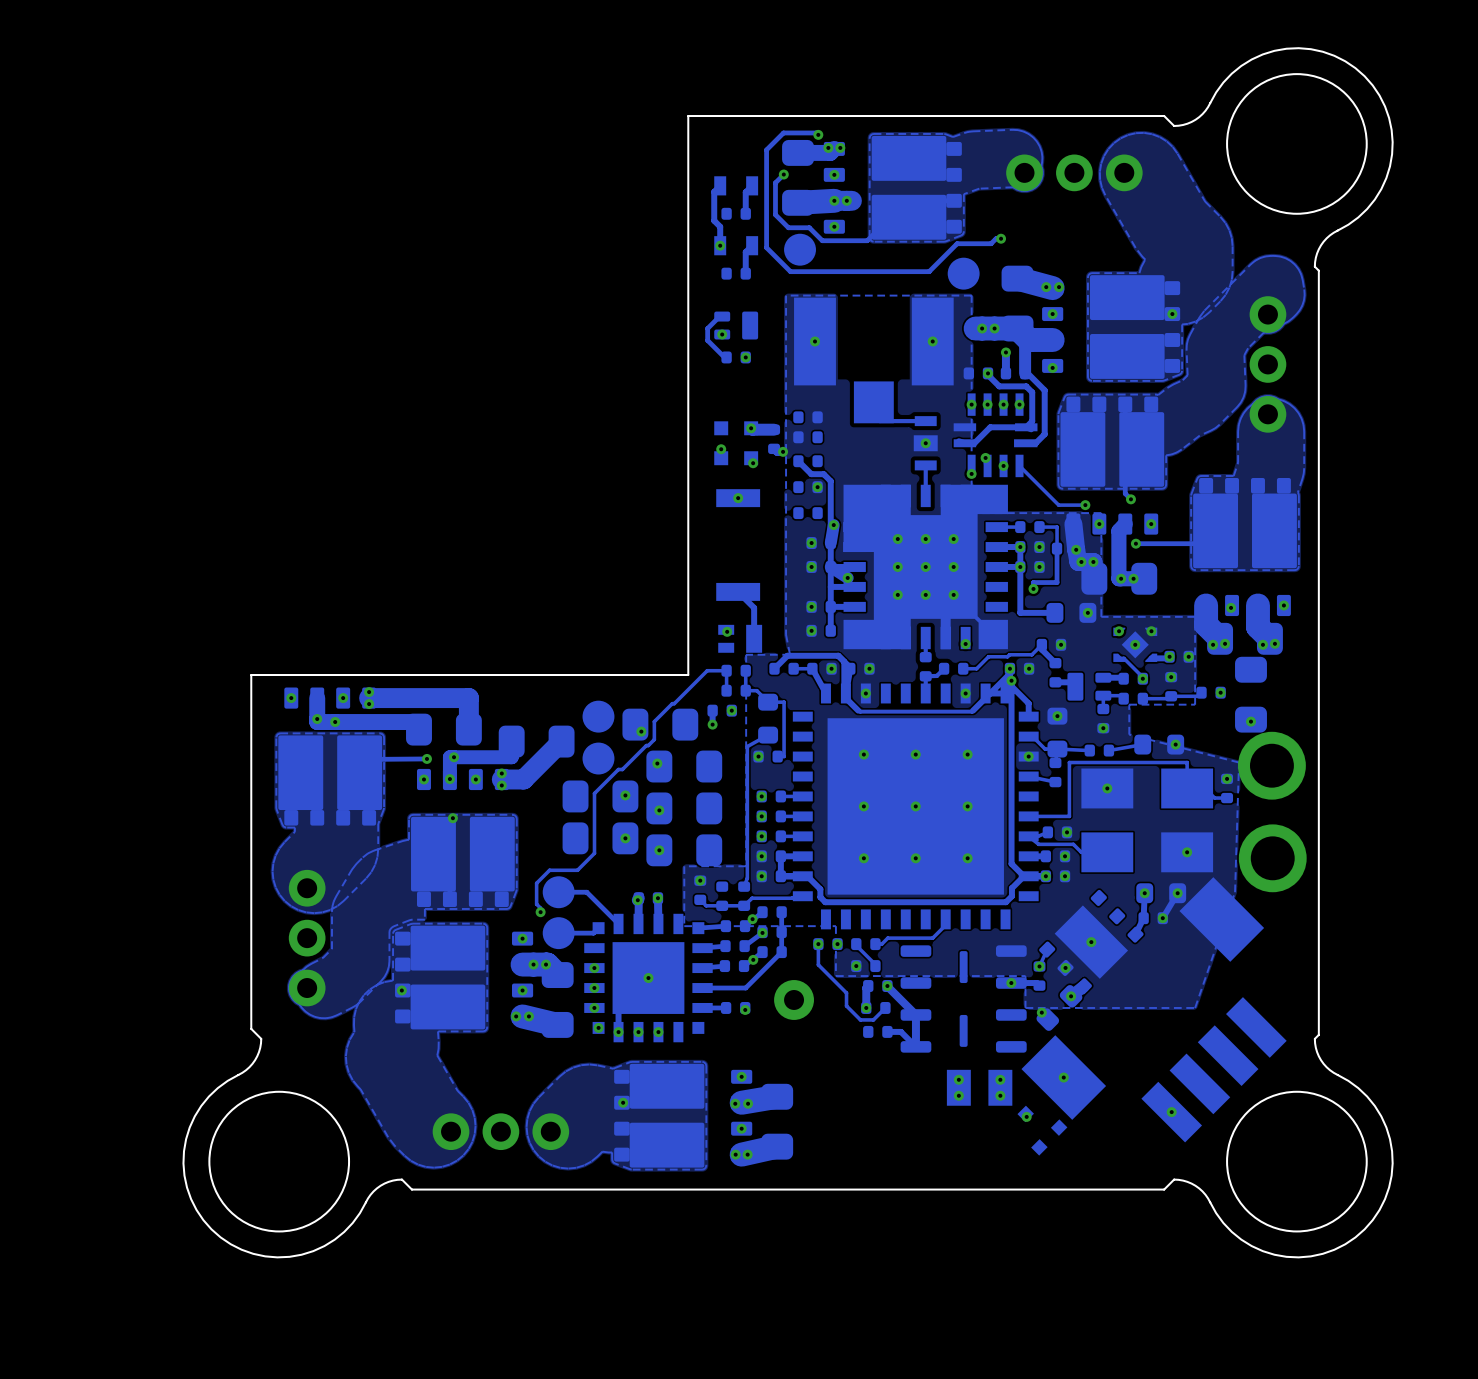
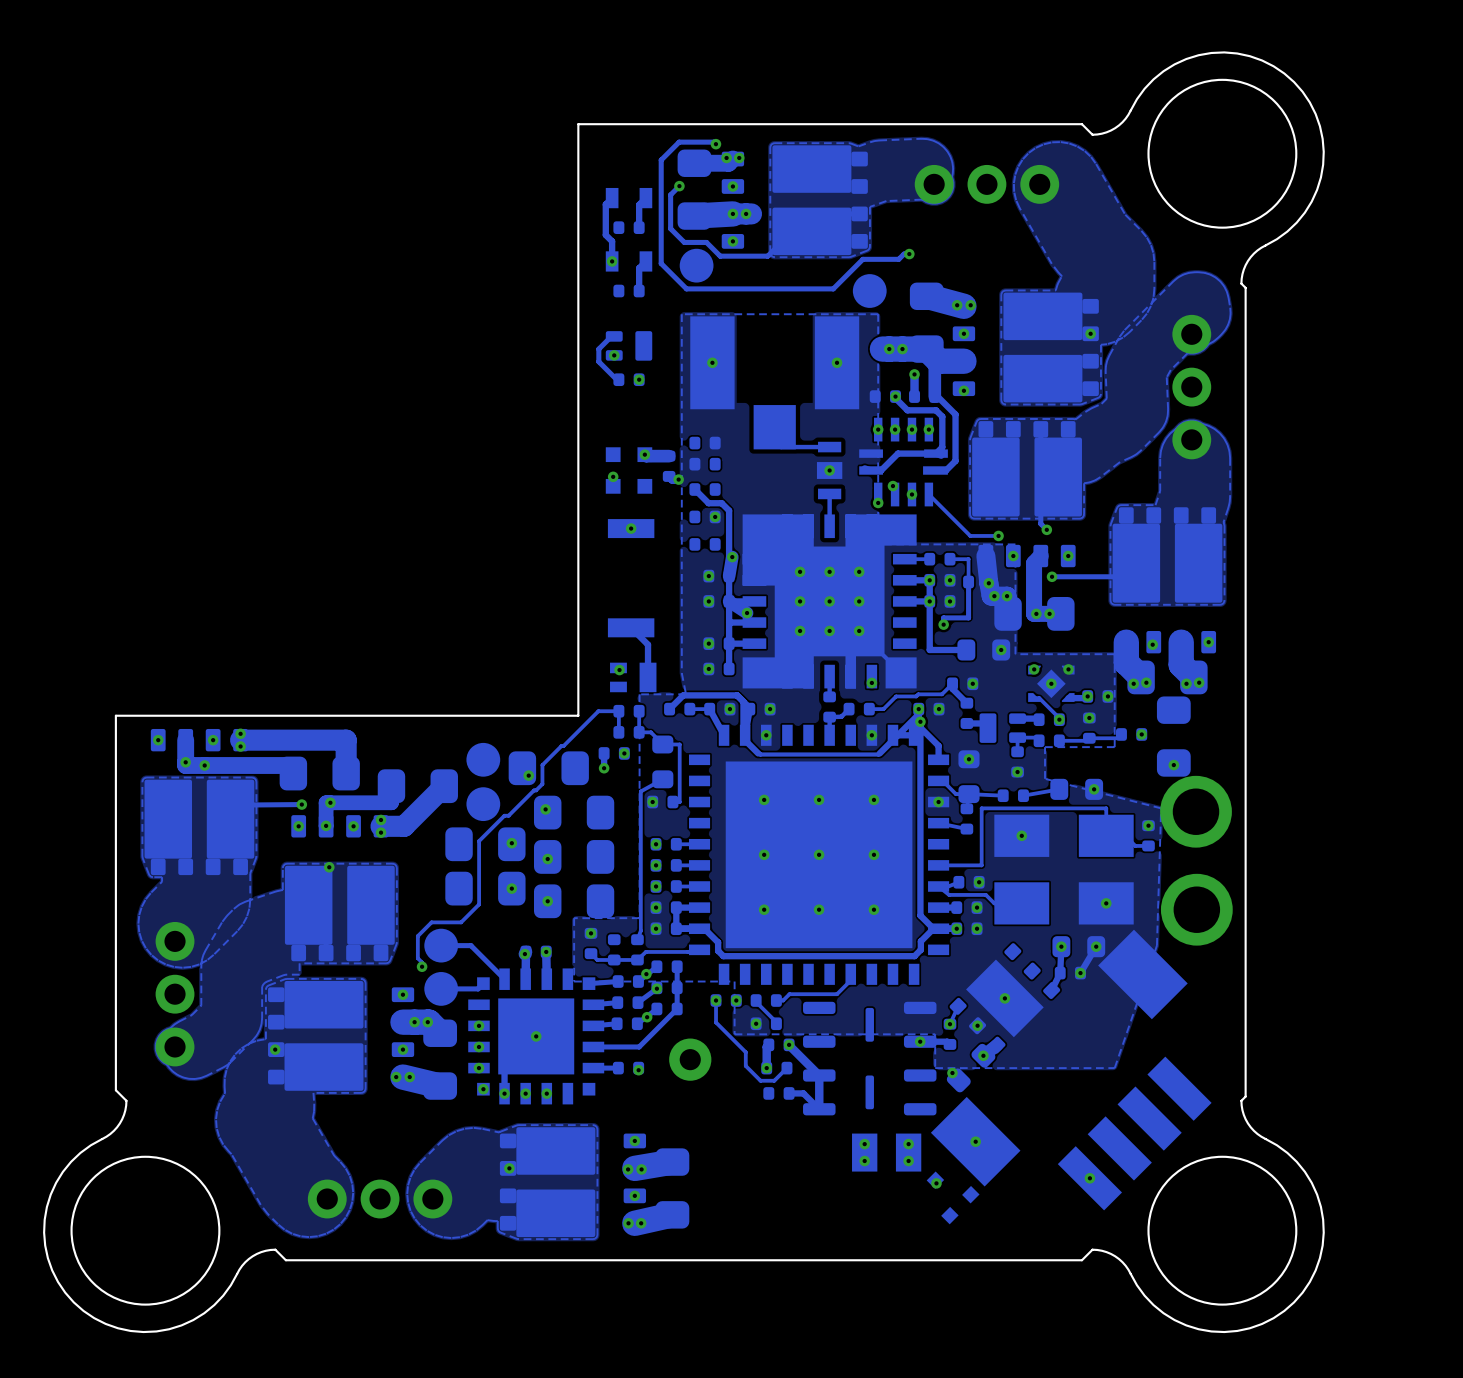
via: (753, 463) -> none

